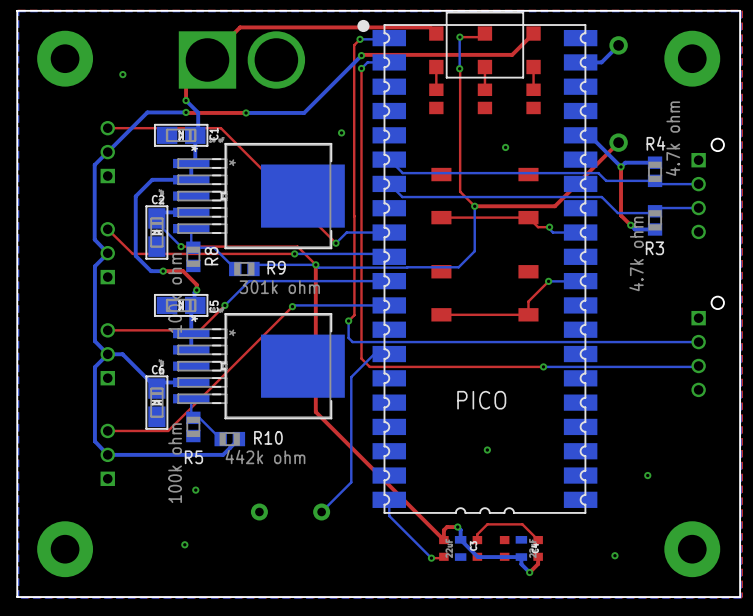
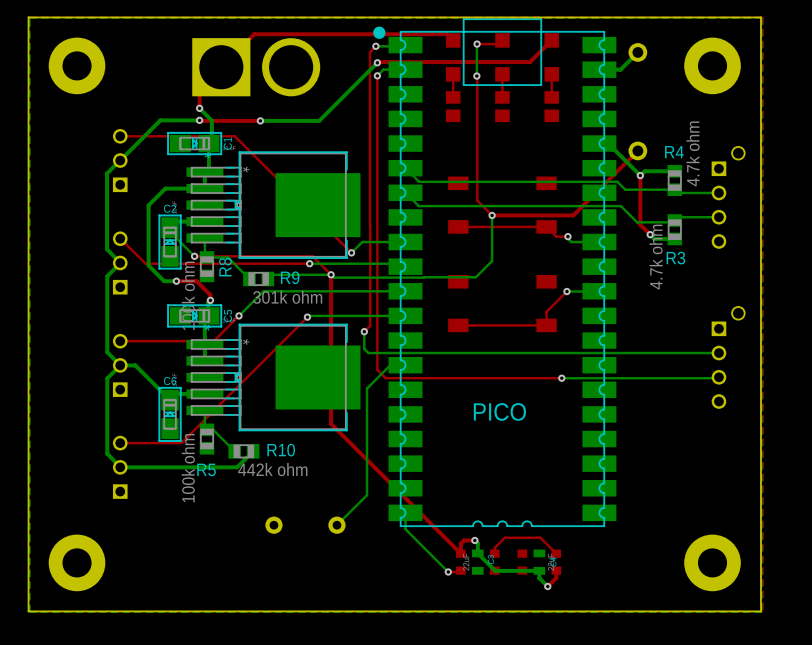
via: (122, 74) -> none
via: (341, 132) -> none
via: (505, 147) -> none
via: (487, 450) -> none
via: (647, 475) -> none
via: (195, 490) -> none
via: (184, 544) -> none
via: (614, 555) -> none

